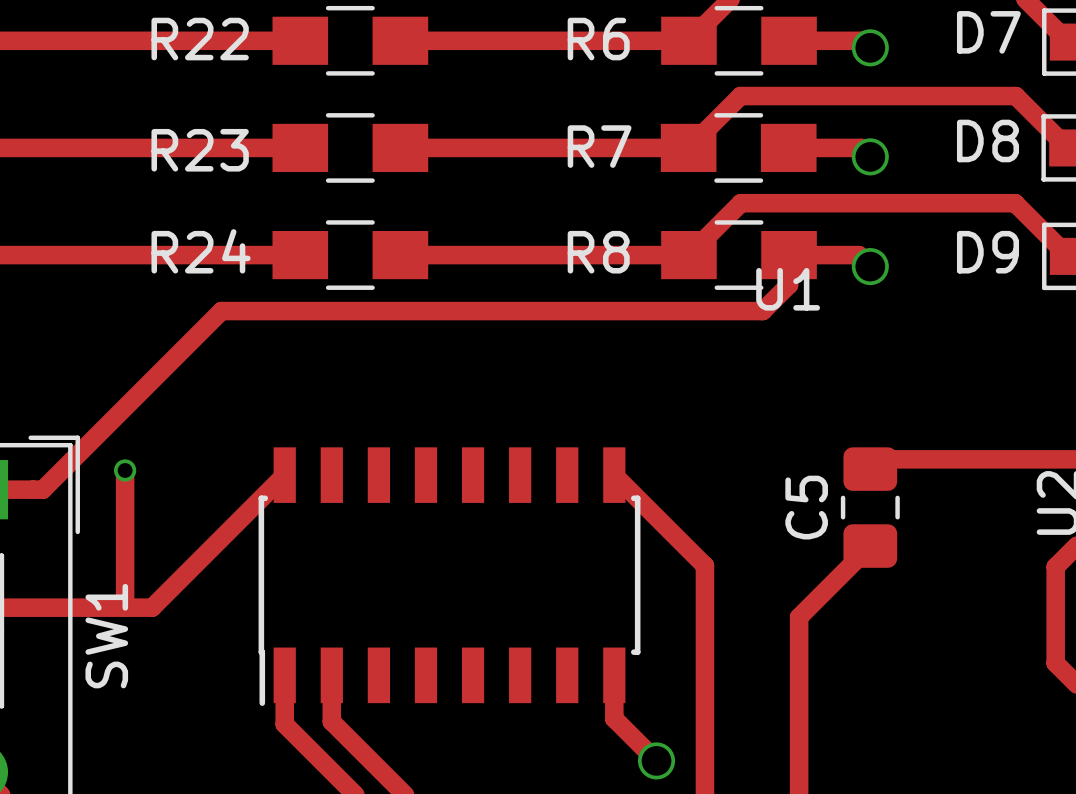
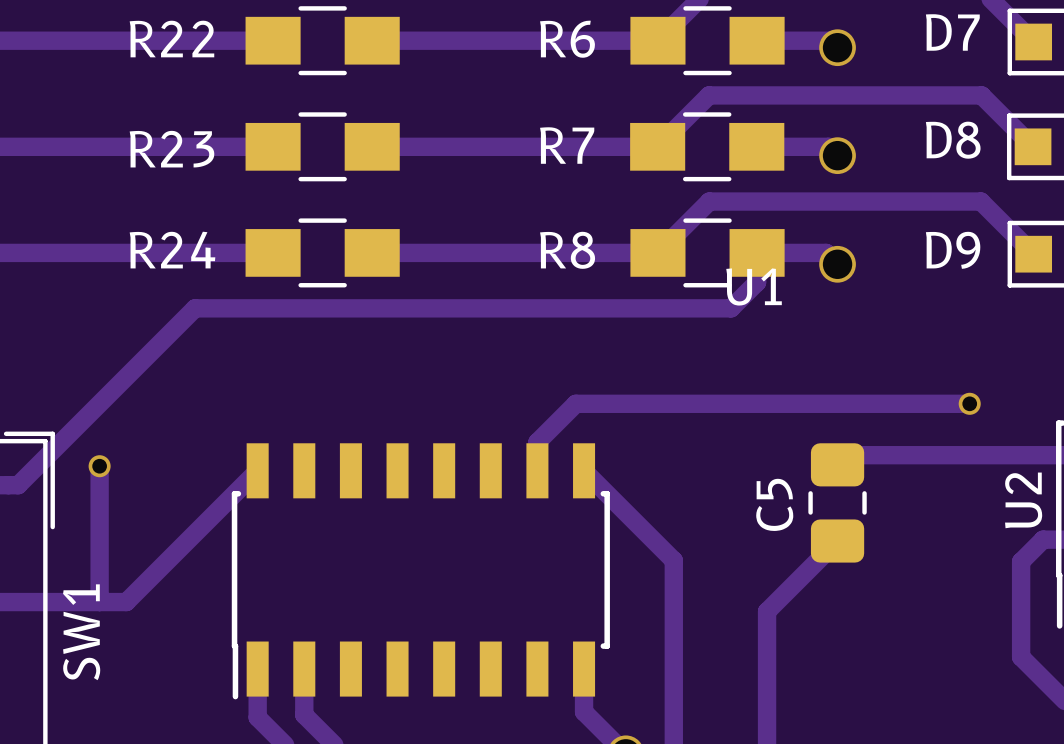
track: none -> (969, 403) (575, 403) (537, 442) (537, 470)
via: none -> (969, 403)

